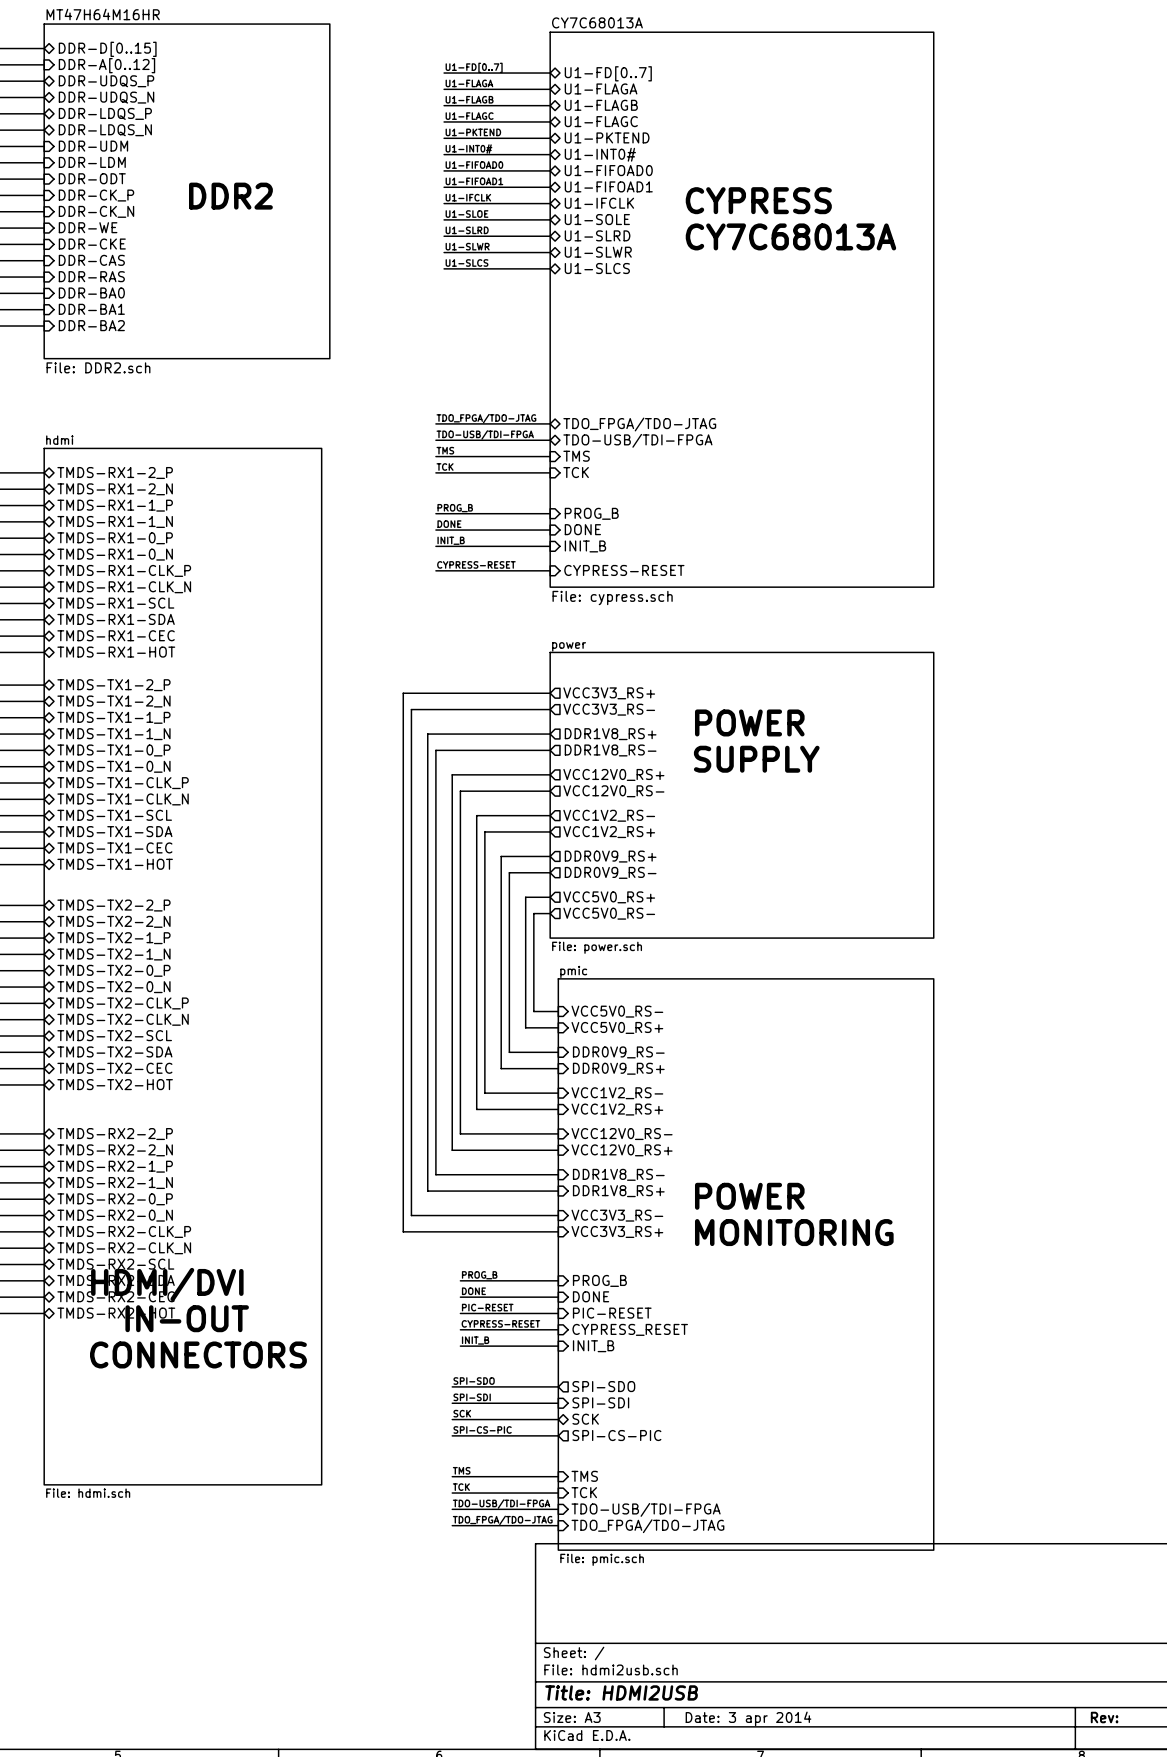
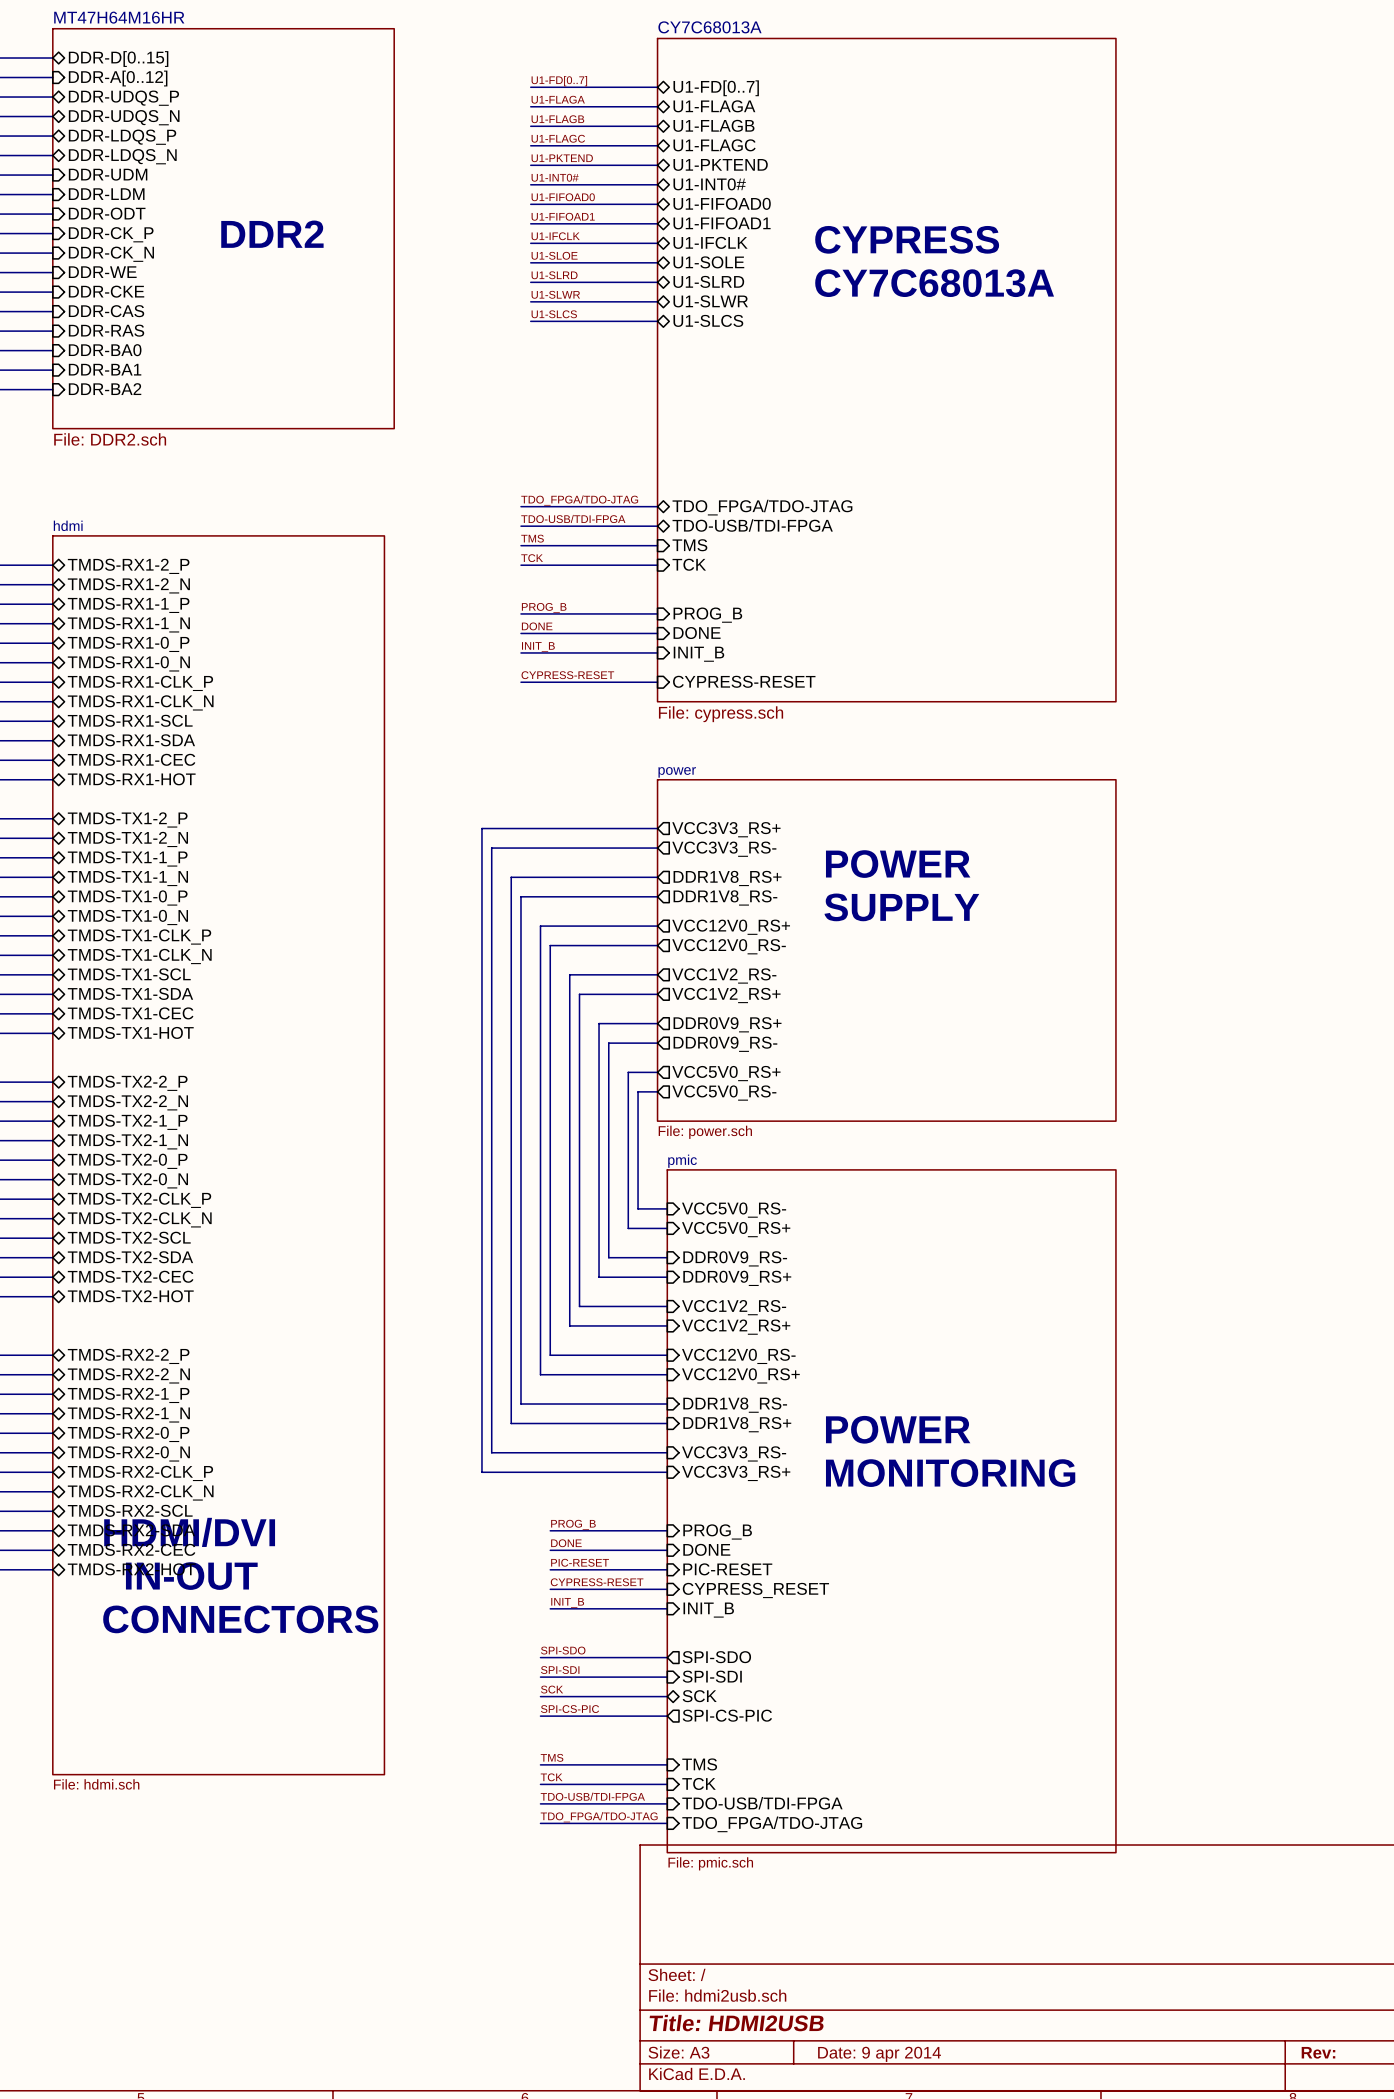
title block: Date: 3 apr 2014 (748, 1718) -> Date: 9 apr 2014 (879, 2054)

